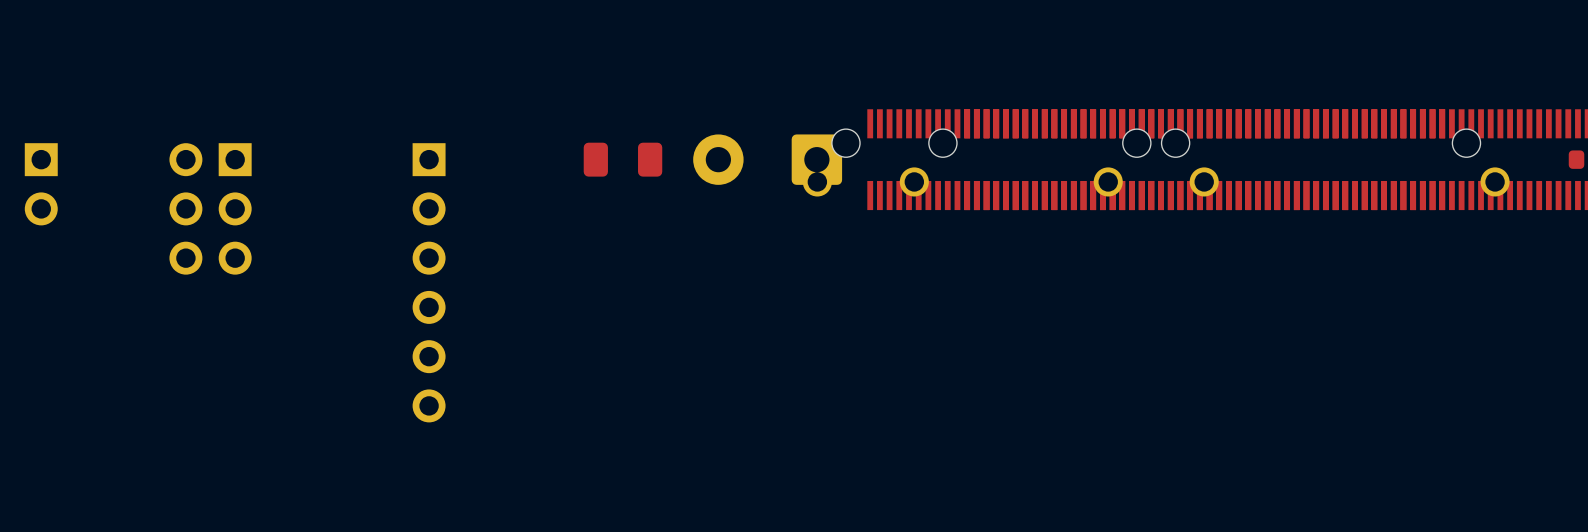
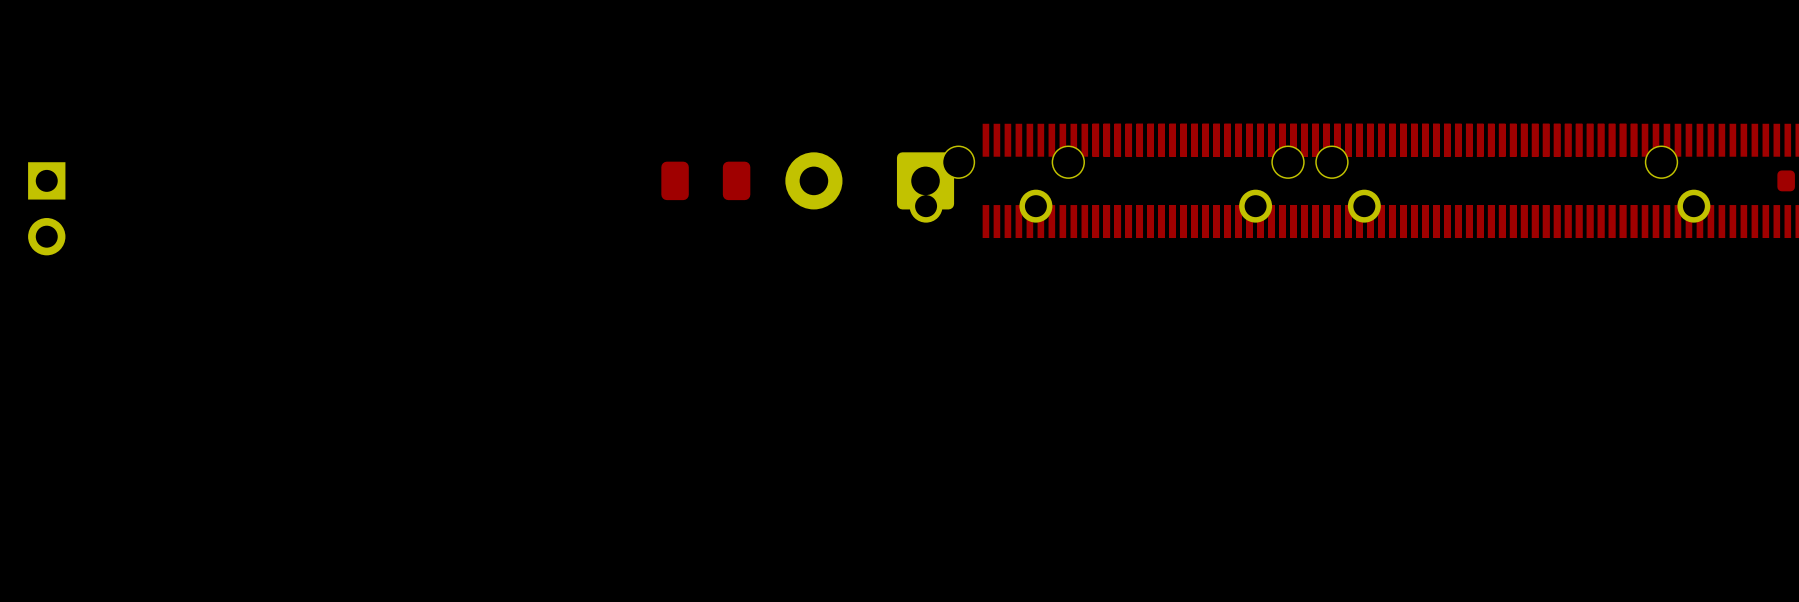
part: (210, 208) -> none
part: (429, 282) -> none

